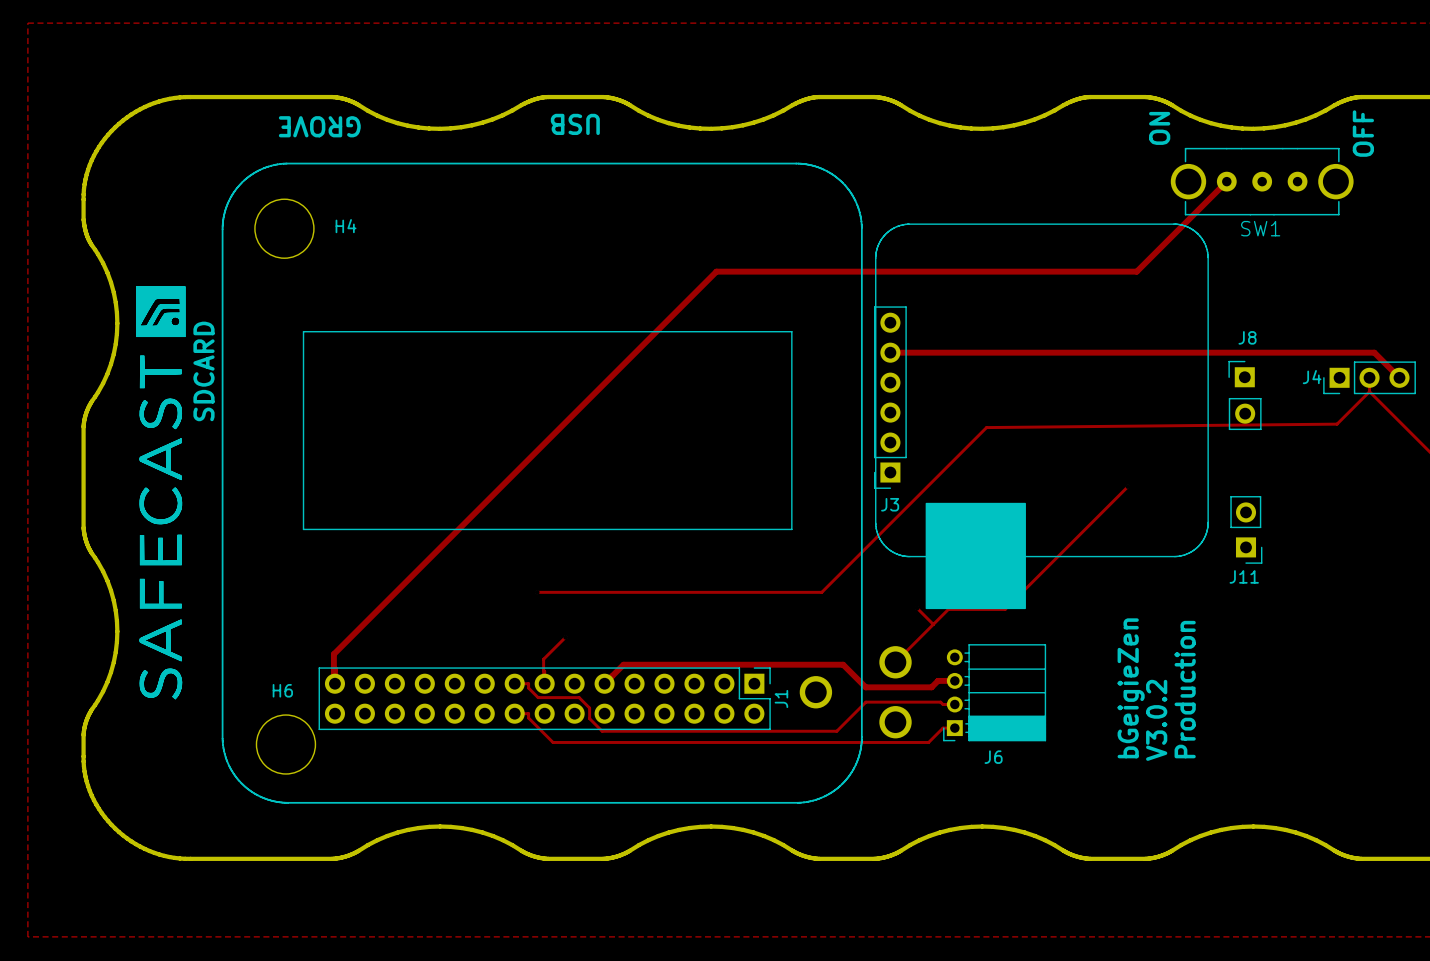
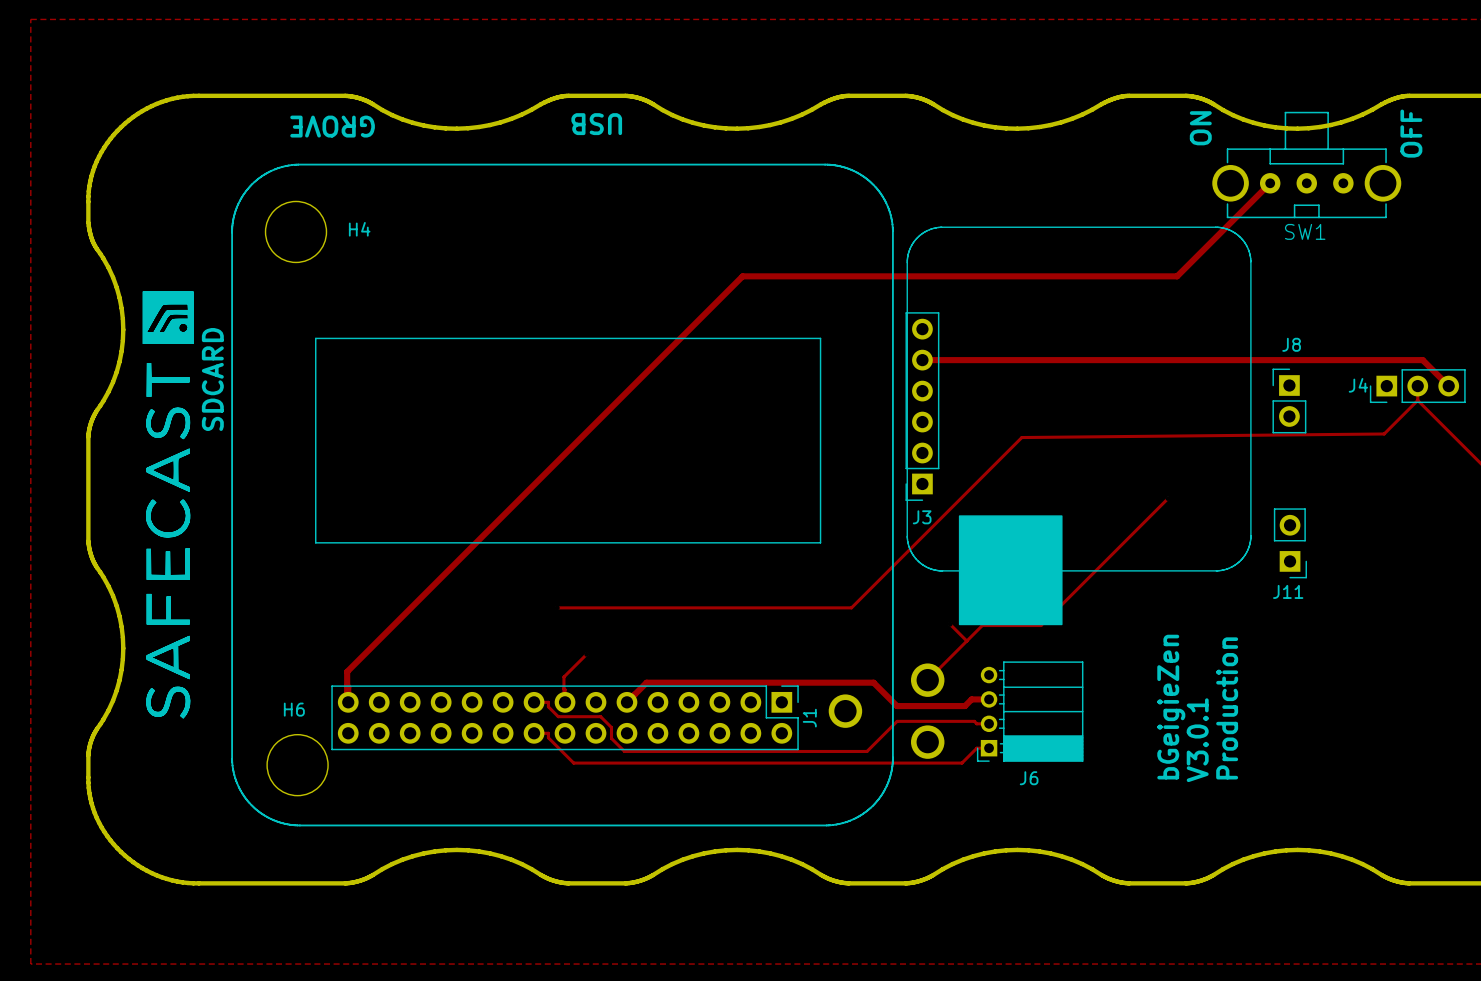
SW1 footprint: [1170, 147, 1354, 216] -> [1212, 111, 1402, 219]
J8 footprint: [1228, 360, 1262, 431] -> [1272, 368, 1307, 434]
text: V3.0.2 (1156, 720) -> V3.0.1 (1197, 740)

